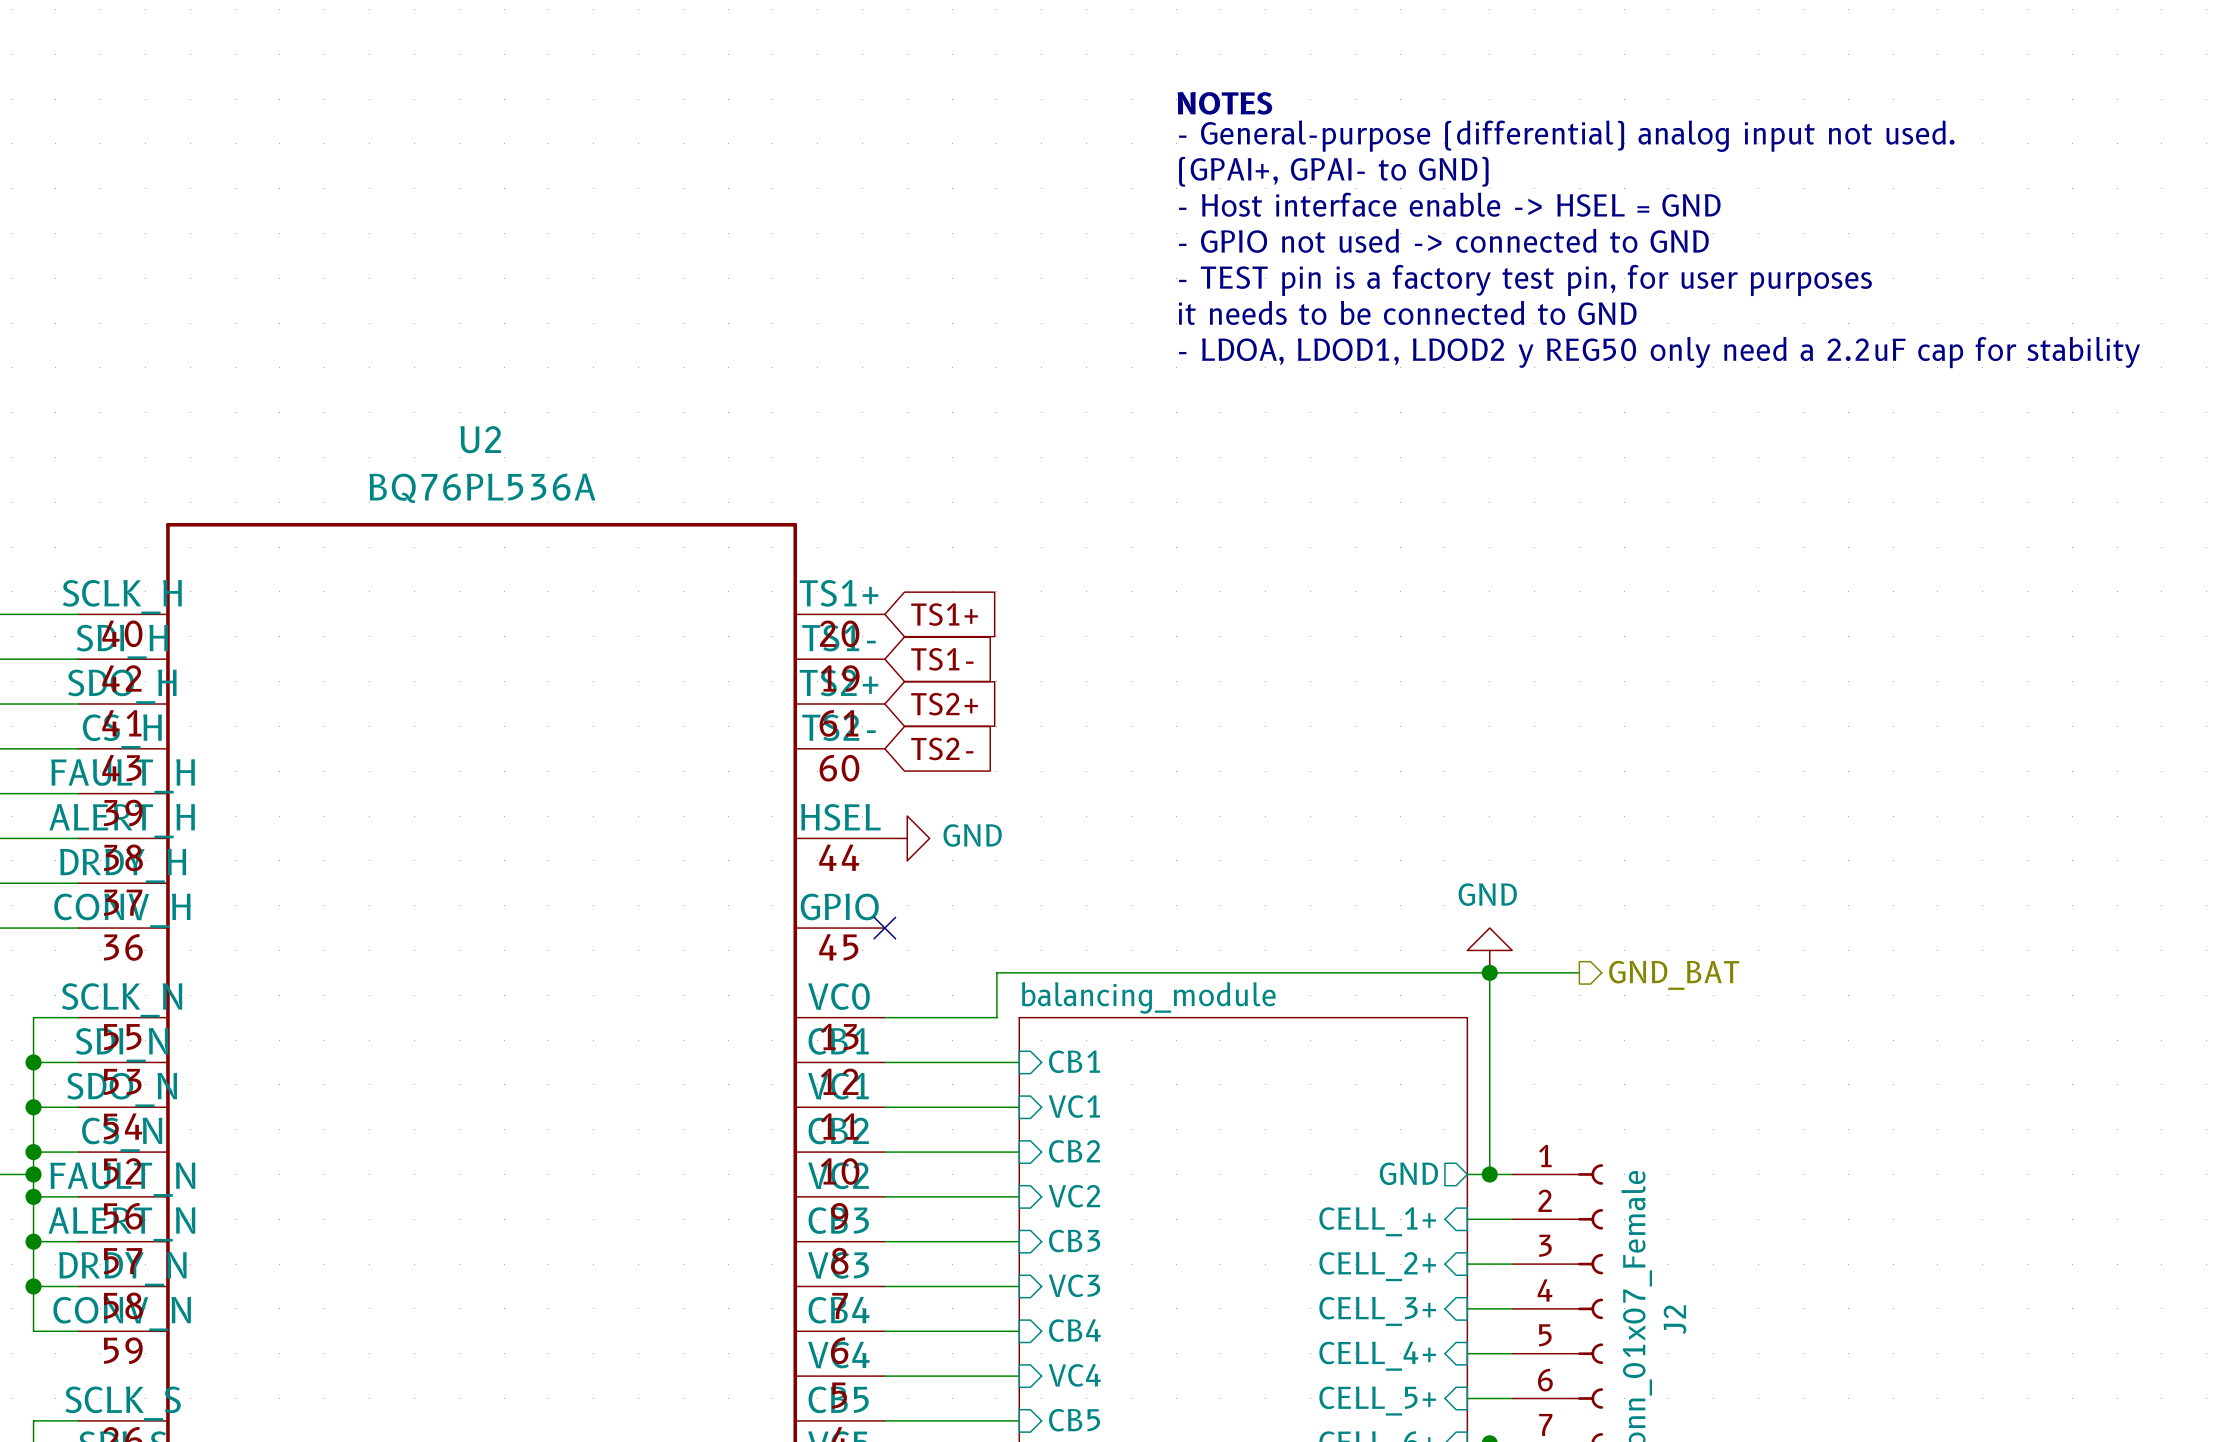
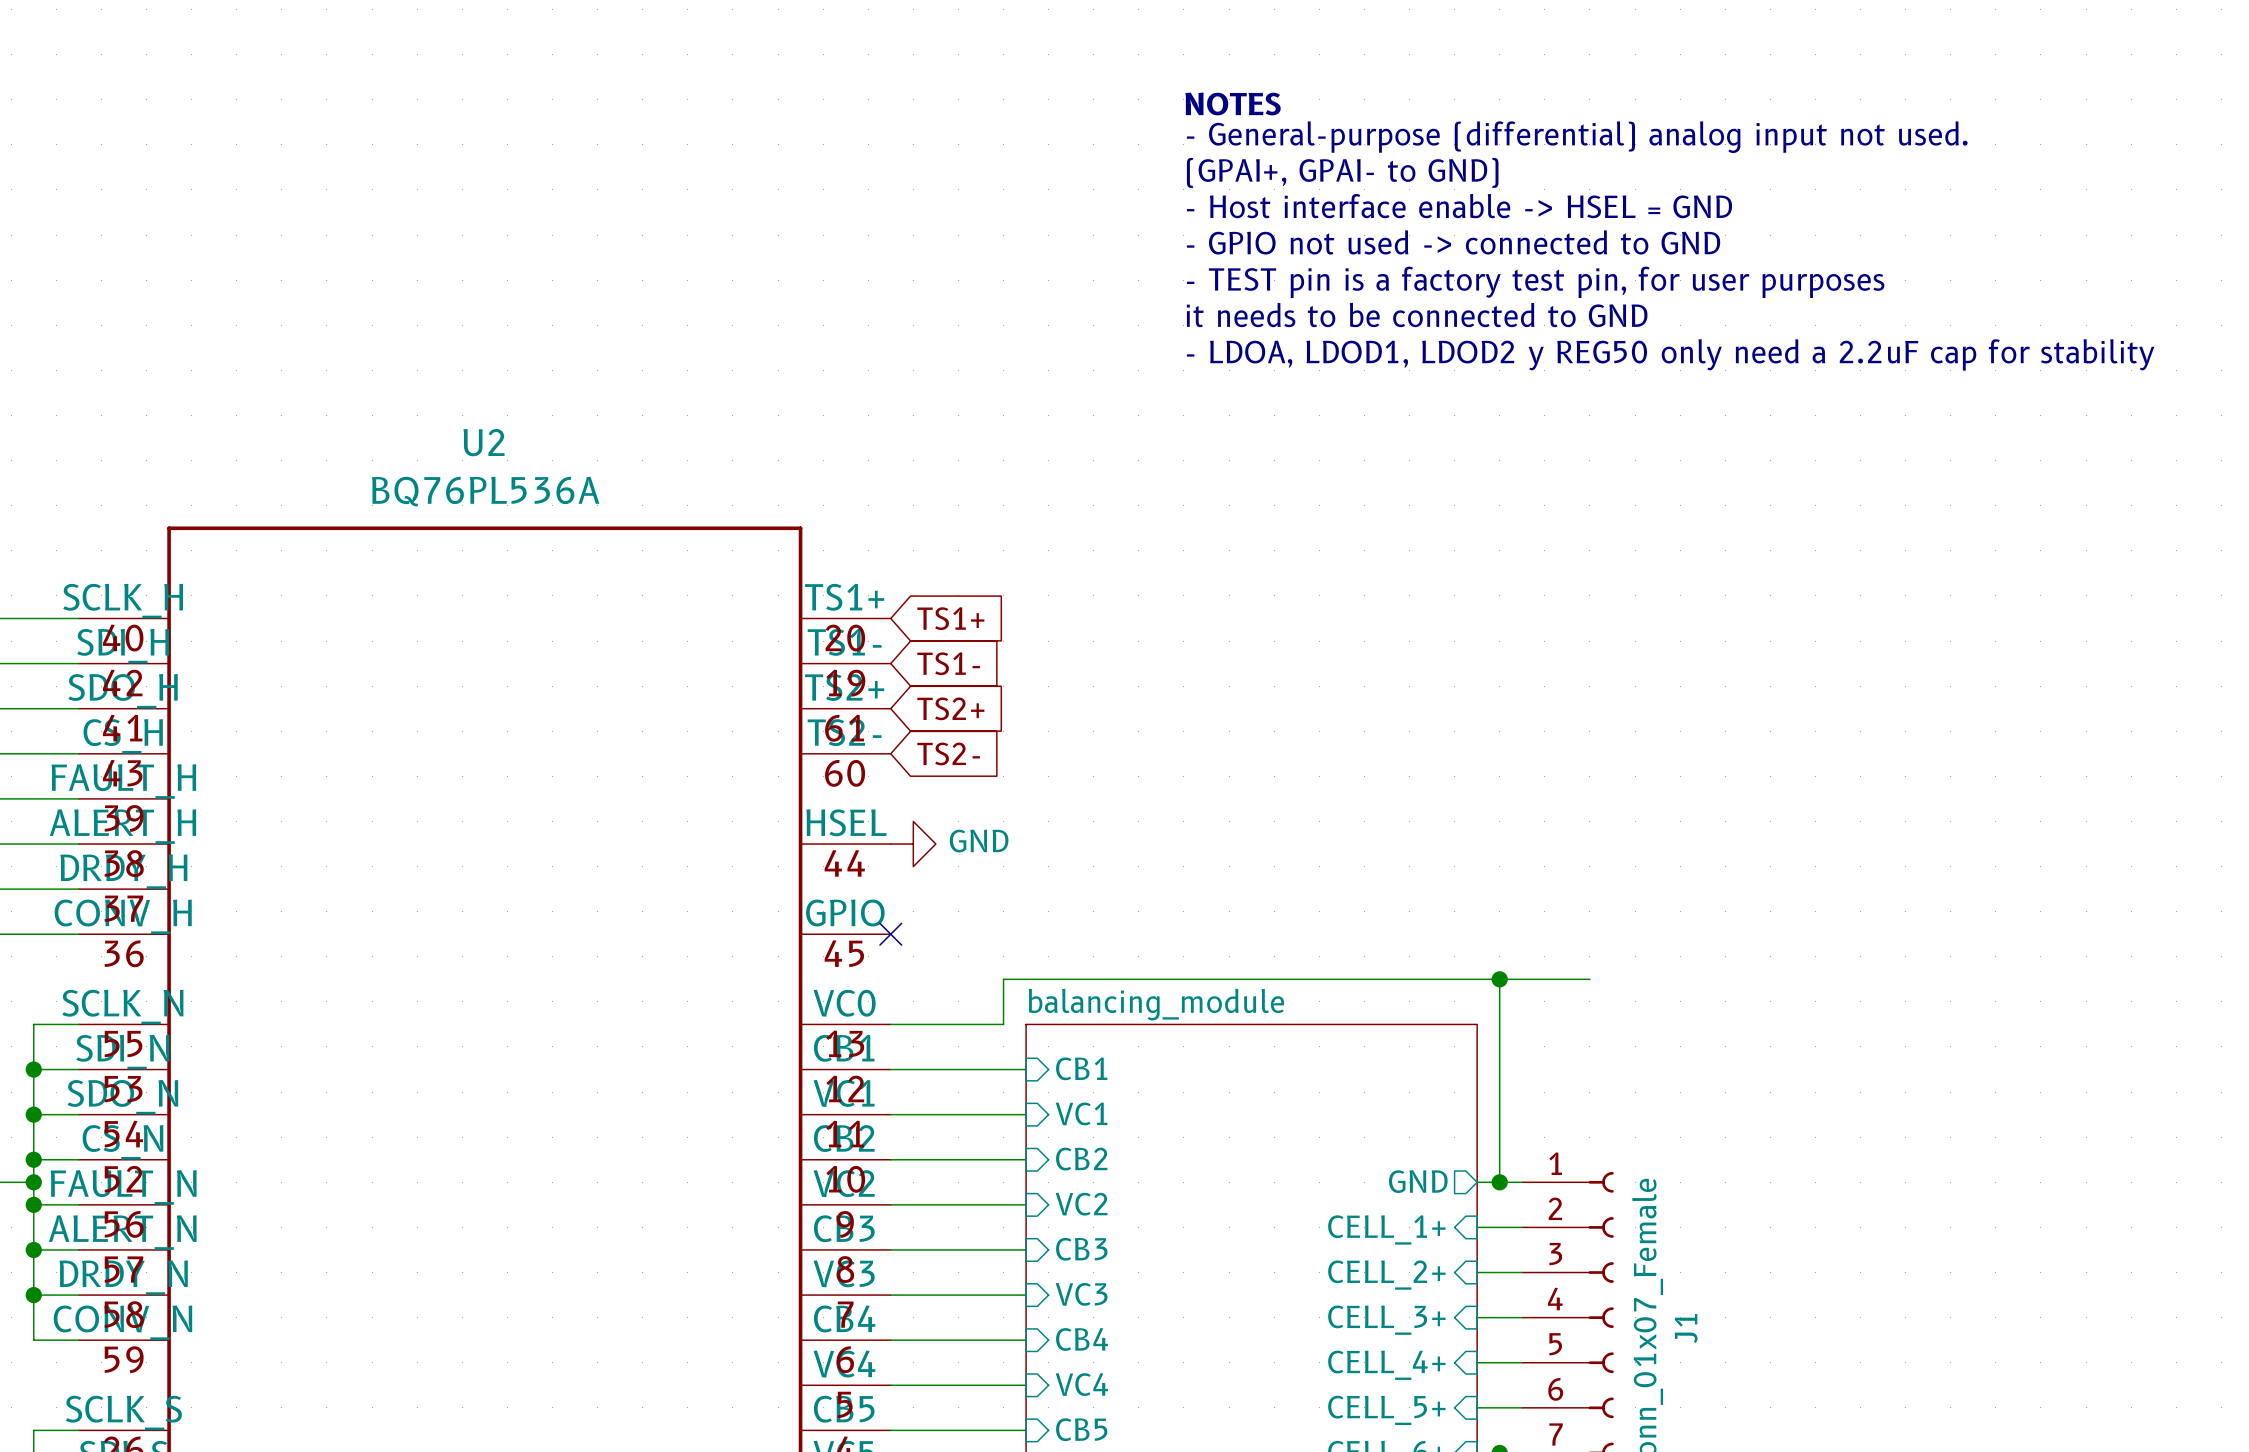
power symbol: GND (1489, 950) -> none
hierarchical label: GND_BAT (1674, 975) -> none
J2 name: J2 (1674, 1319) -> J1 (1686, 1328)

